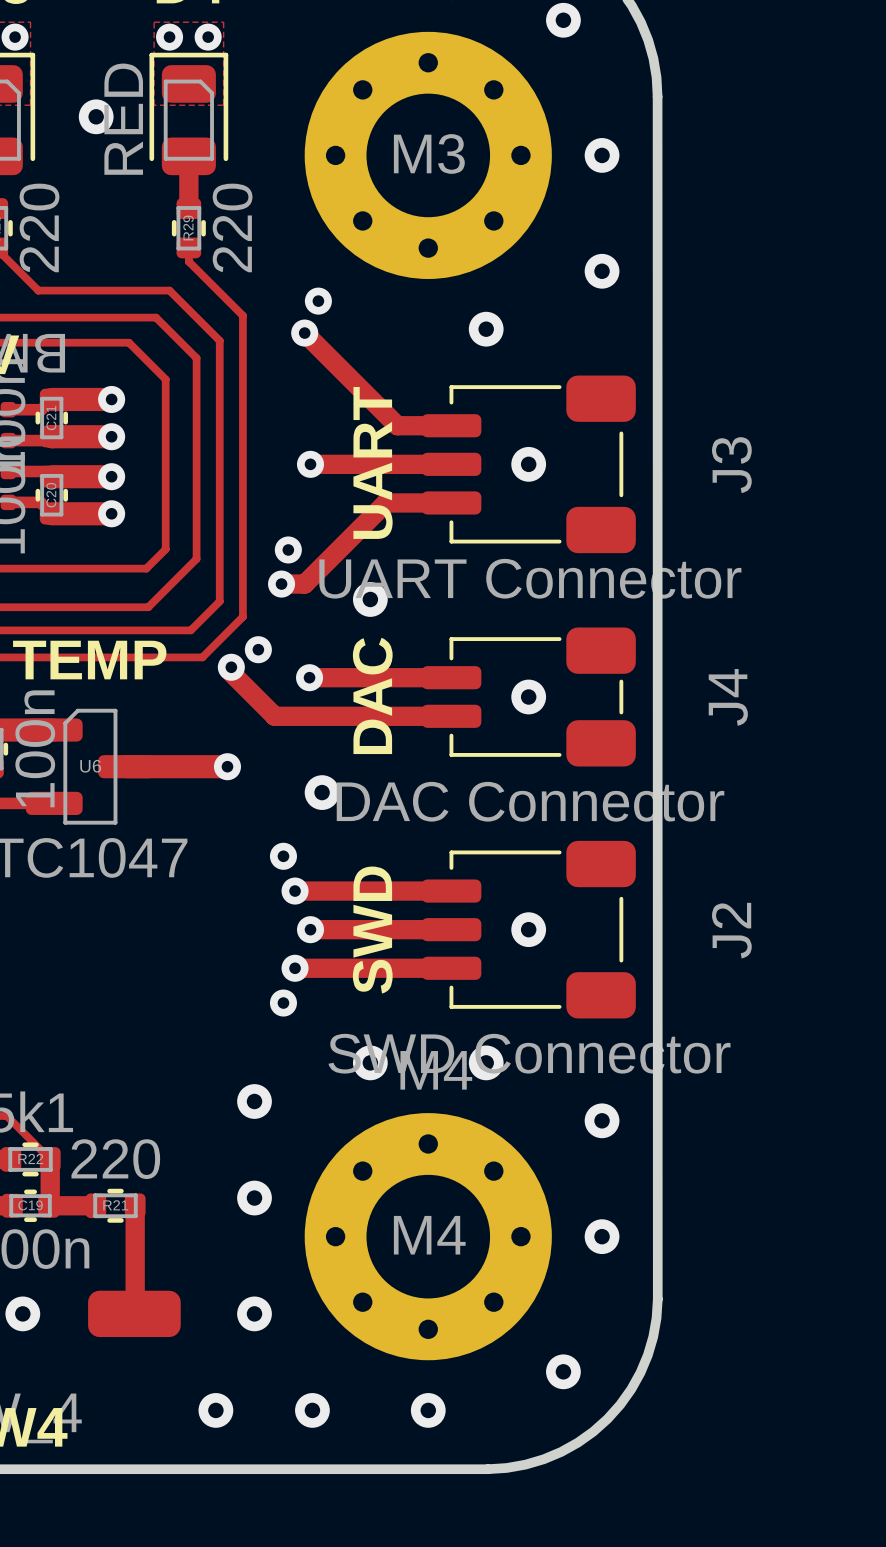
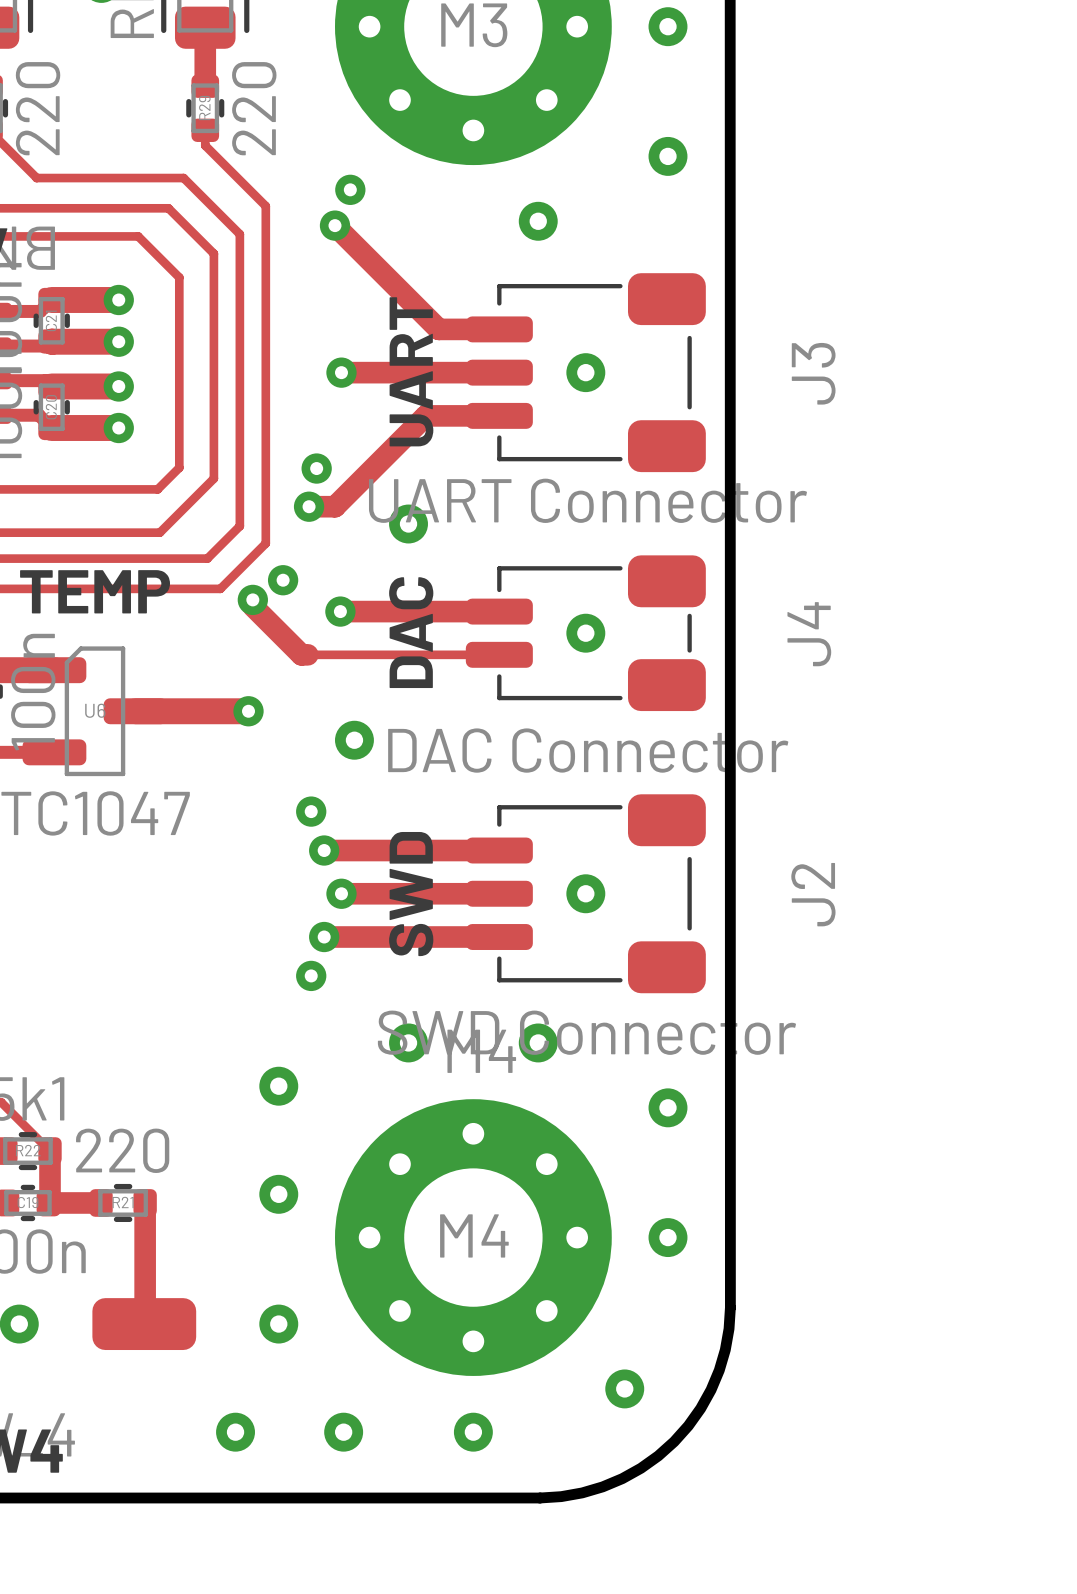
track width: thick (280, 716) (451, 716) -> thin (307, 654) (499, 654)

